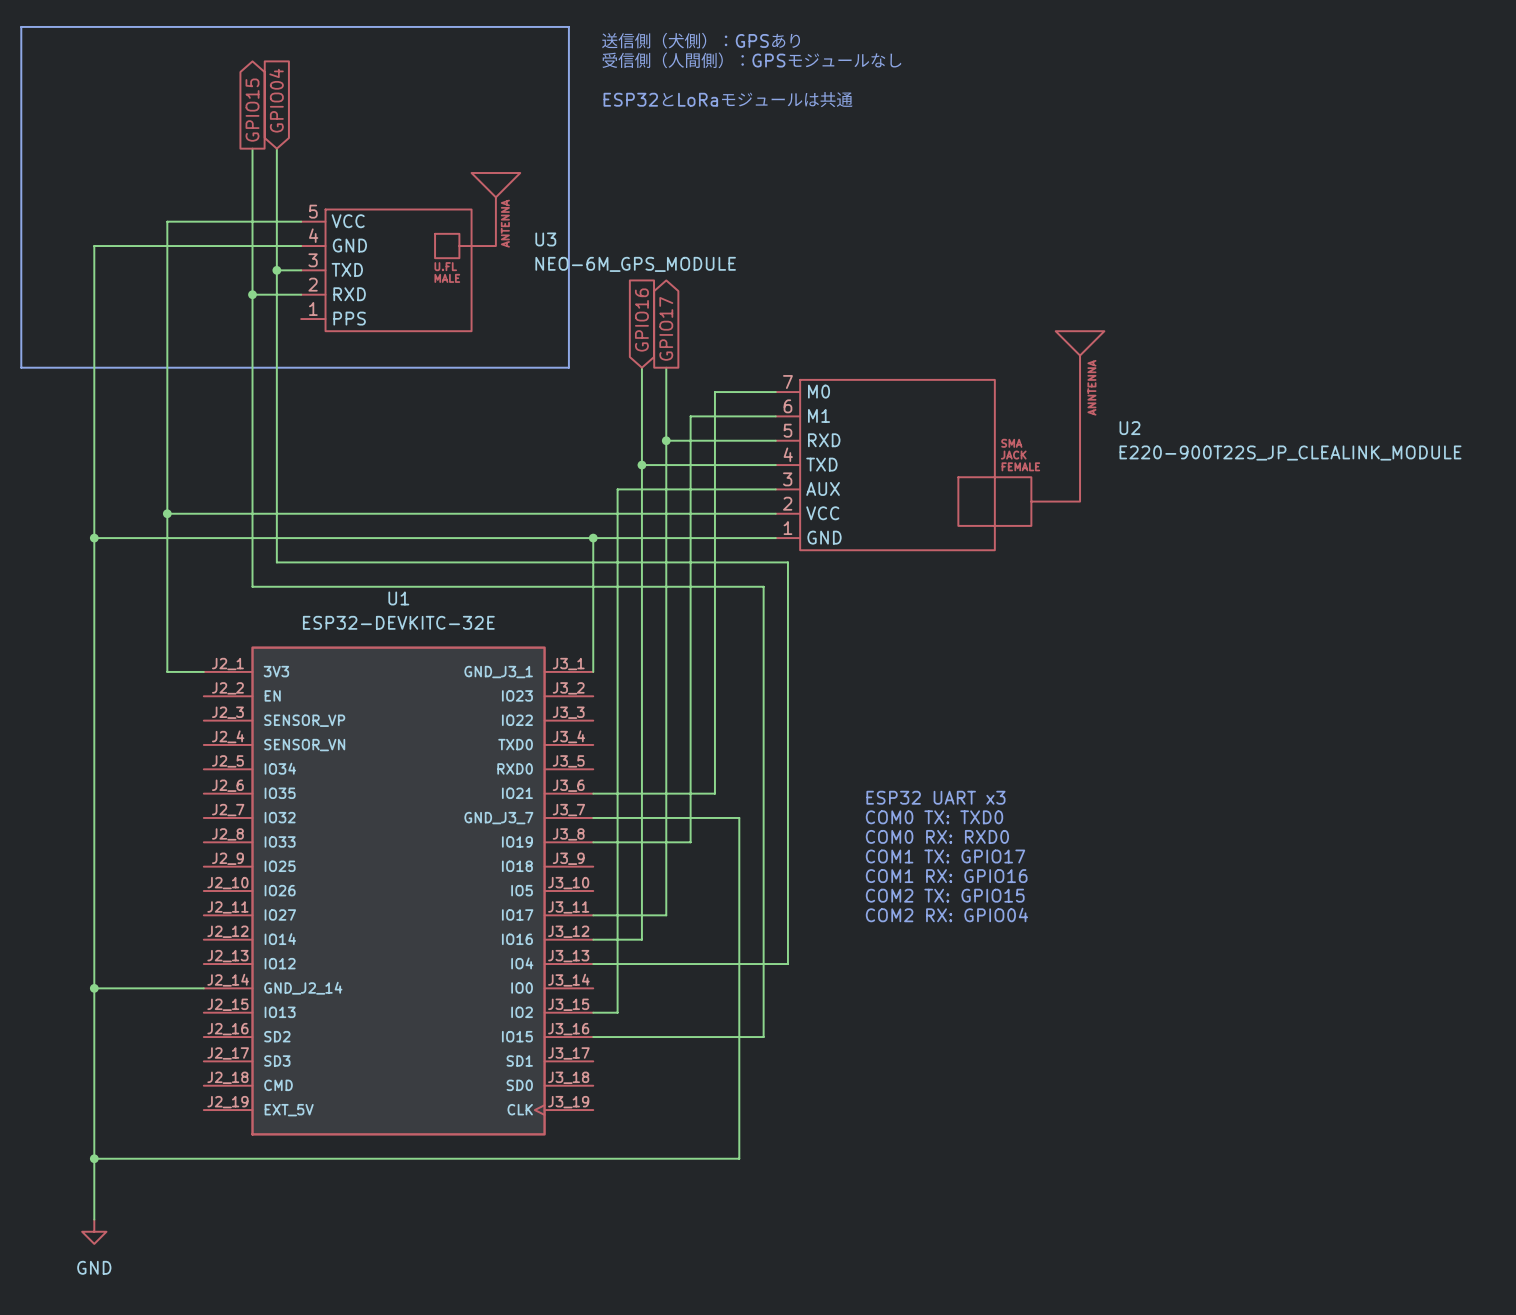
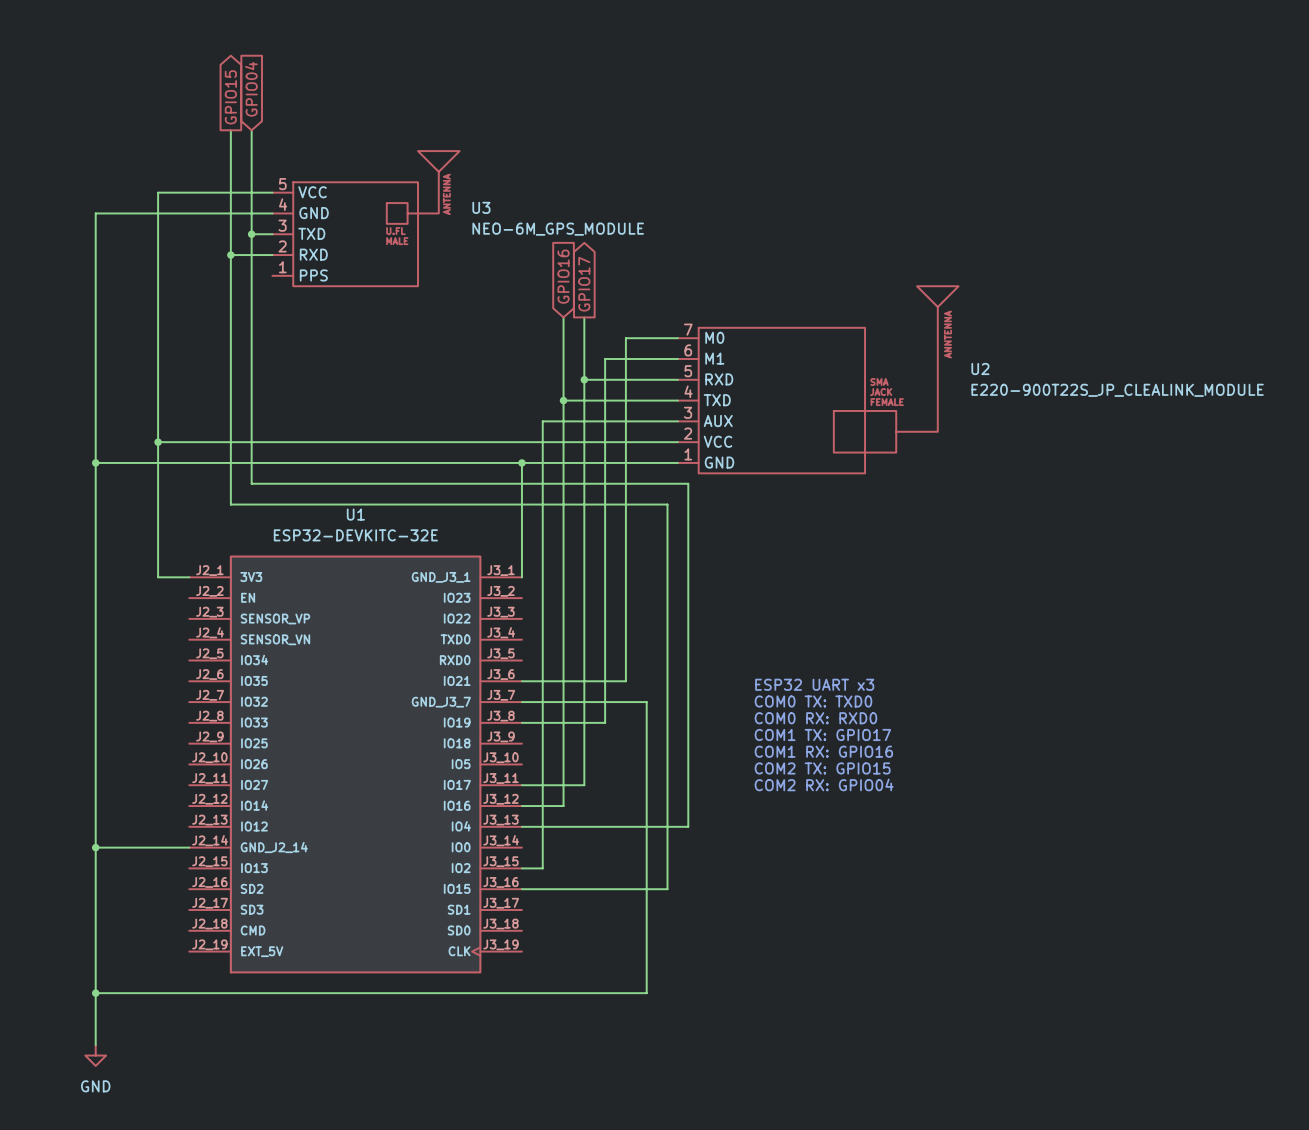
line: (21, 26) (568, 26) (568, 367) (21, 367) (21, 26) -> none
text: 送信側（犬側）：GPSあり (701, 40) -> none
text: 受信側（人間側）：GPSモジュールなし (751, 60) -> none
text: ESP32とLoRaモジュールは共通 (728, 99) -> none

